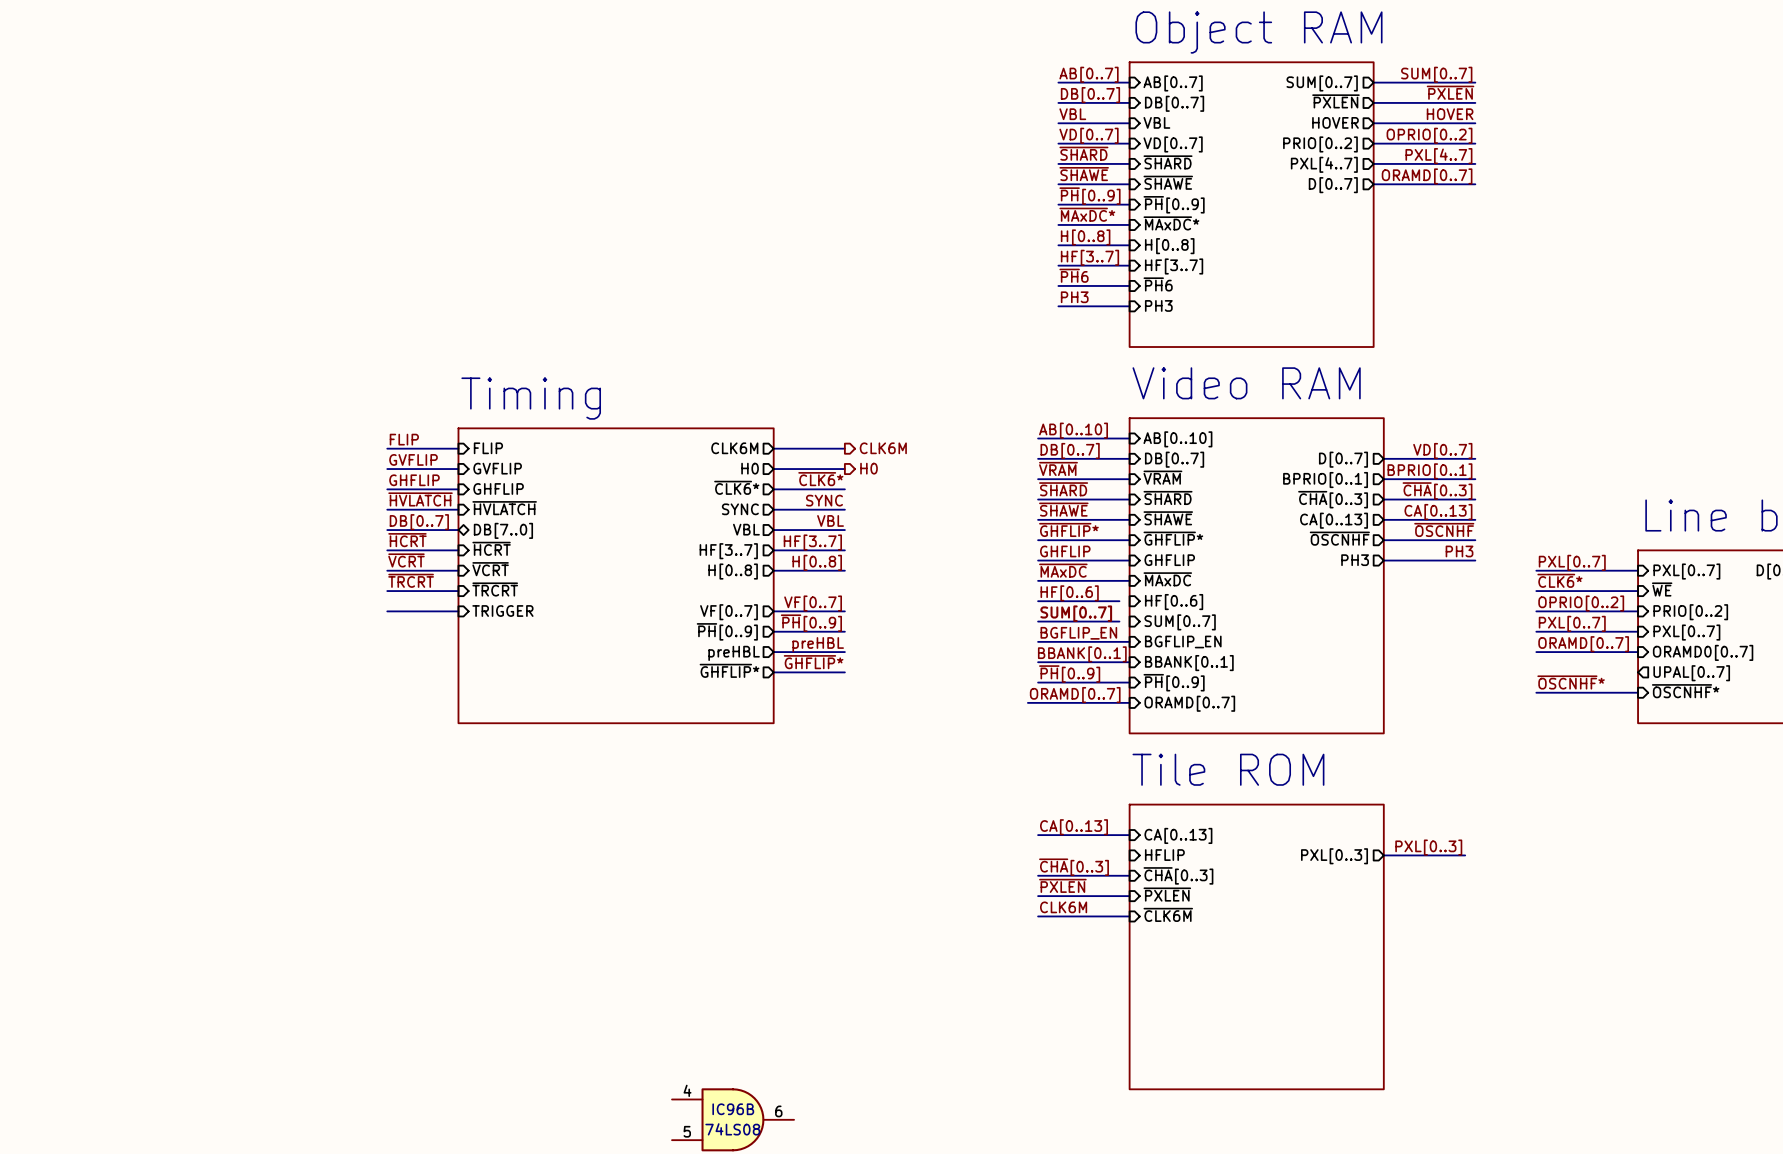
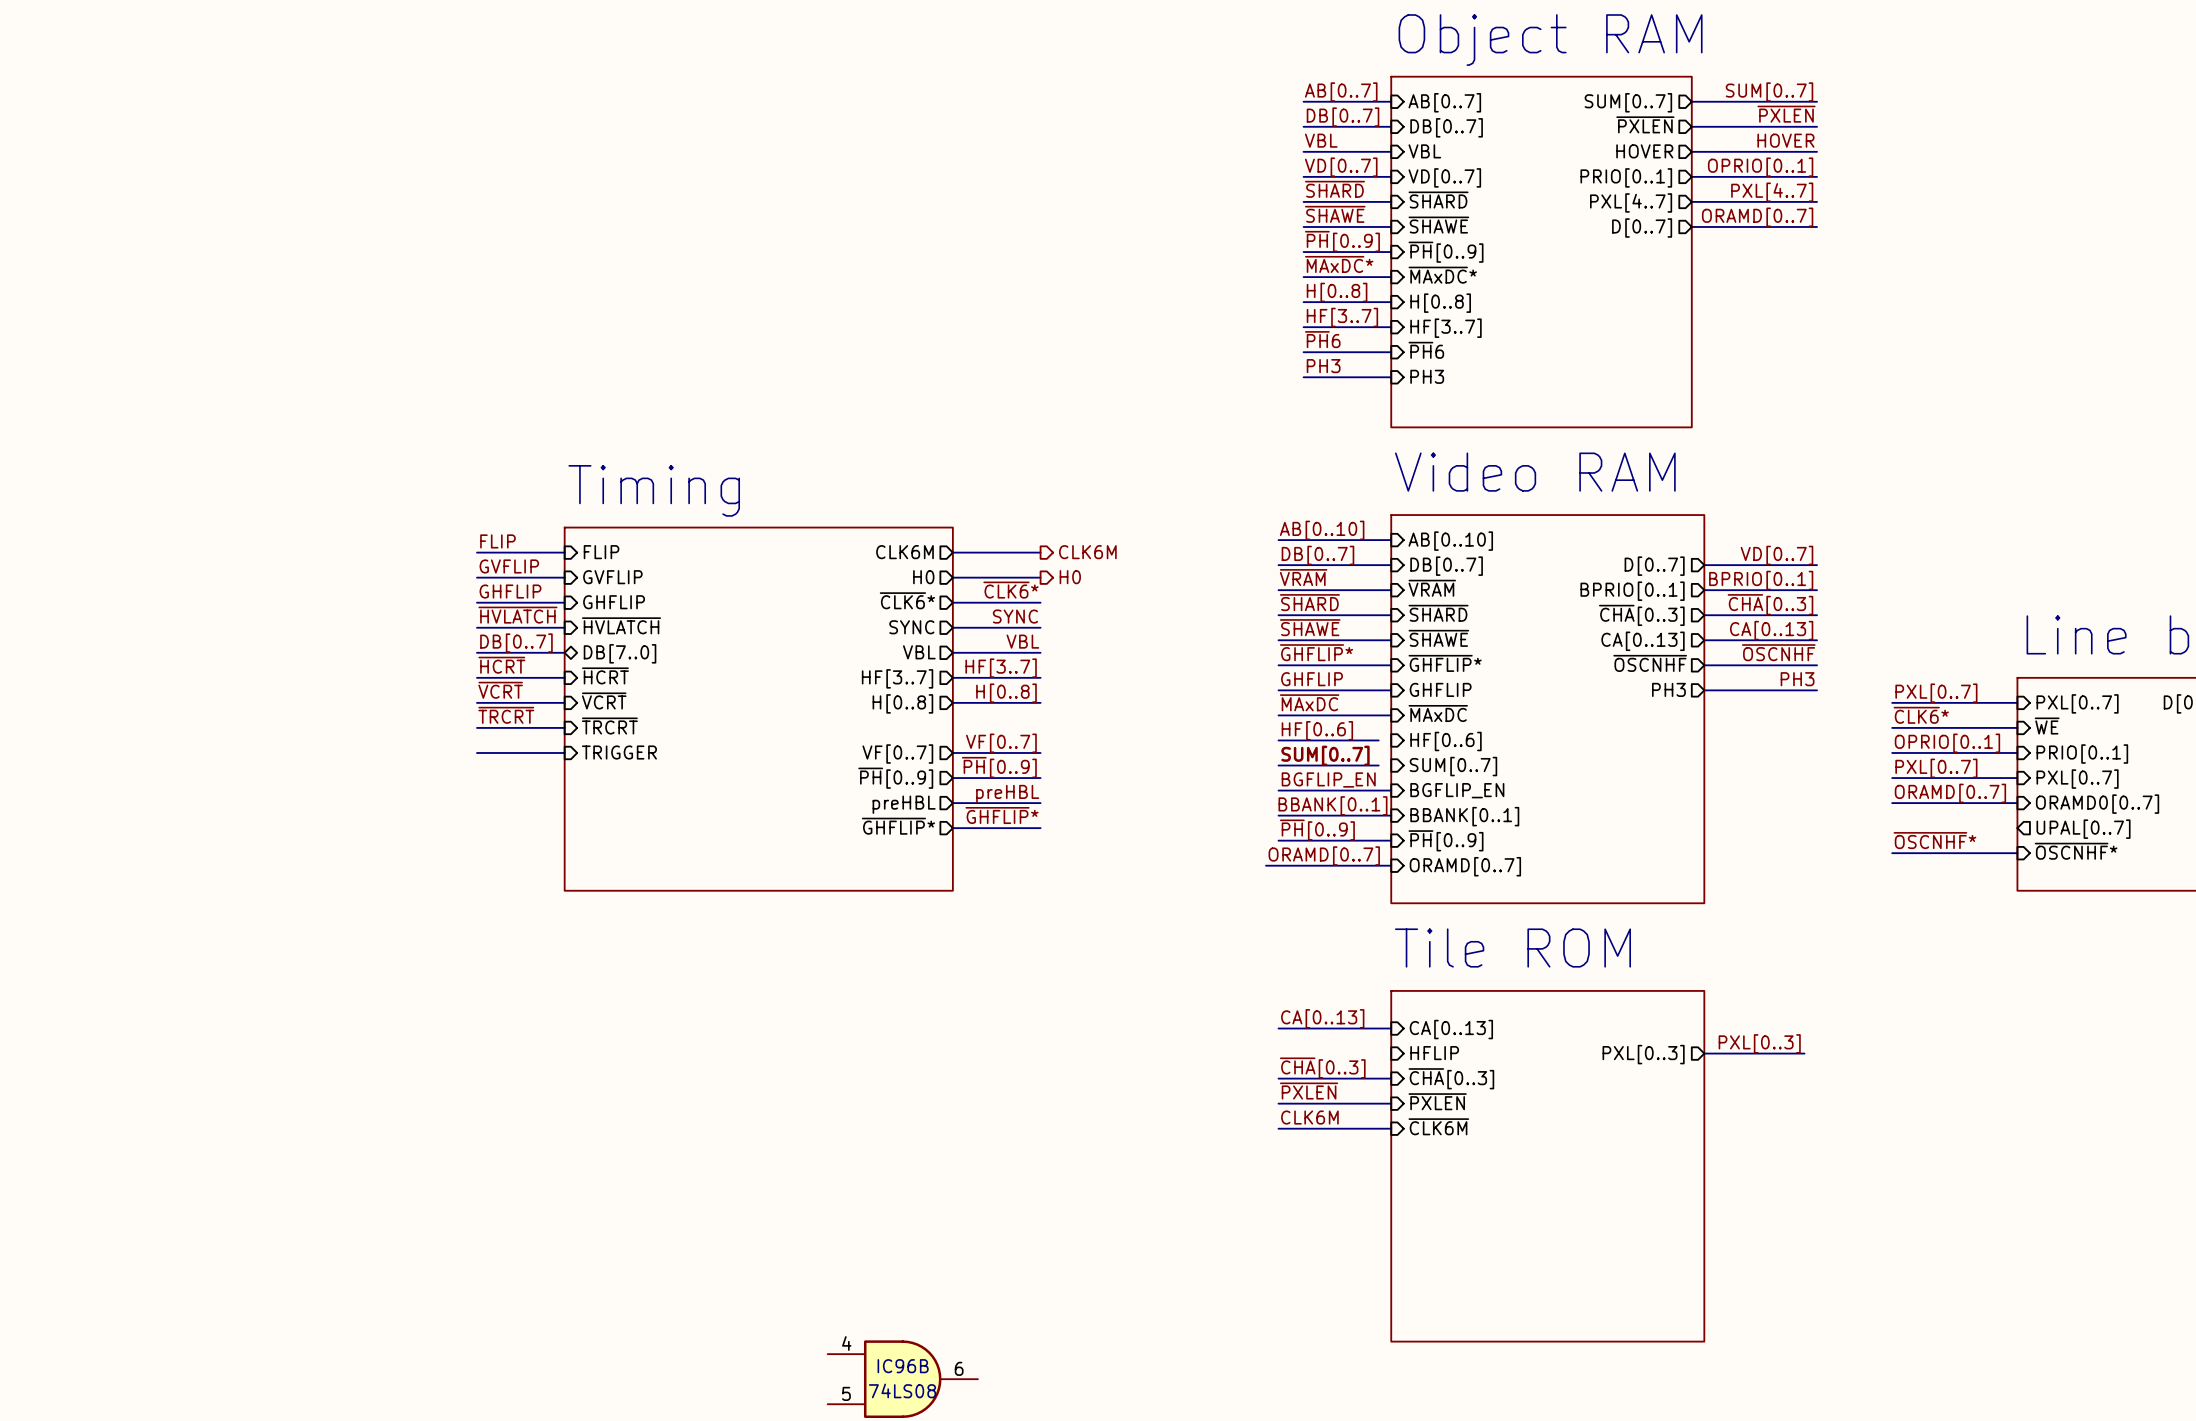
label: OPRIO[0..2] (1429, 135) -> OPRIO[0..1] (1760, 167)
sheet pin: PRIO[0..2] (1320, 144) -> PRIO[0..1] (1626, 177)
label: OPRIO[0..2] (1581, 603) -> OPRIO[0..1] (1947, 743)
sheet pin: PRIO[0..2] (1690, 612) -> PRIO[0..1] (2082, 754)

